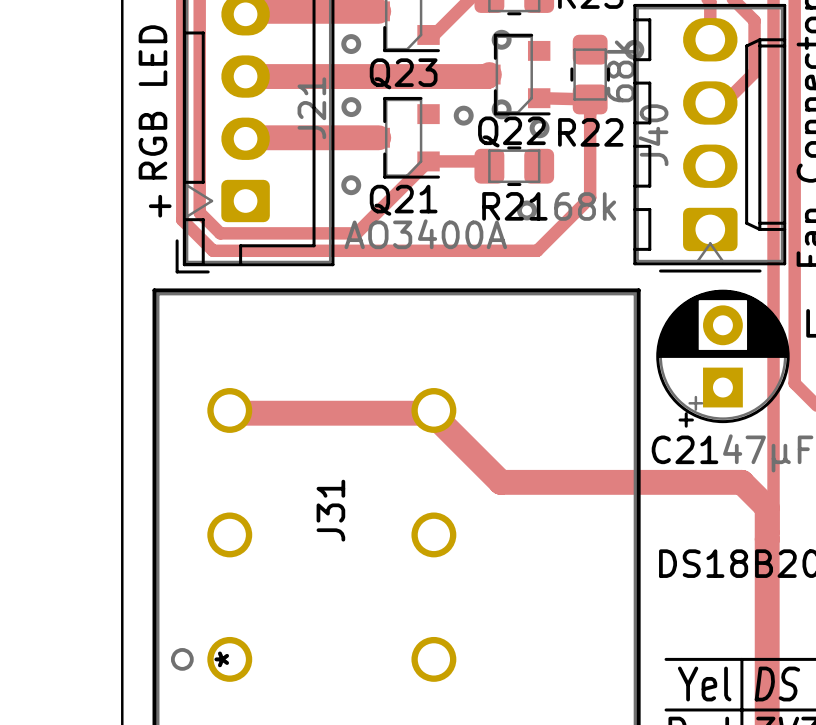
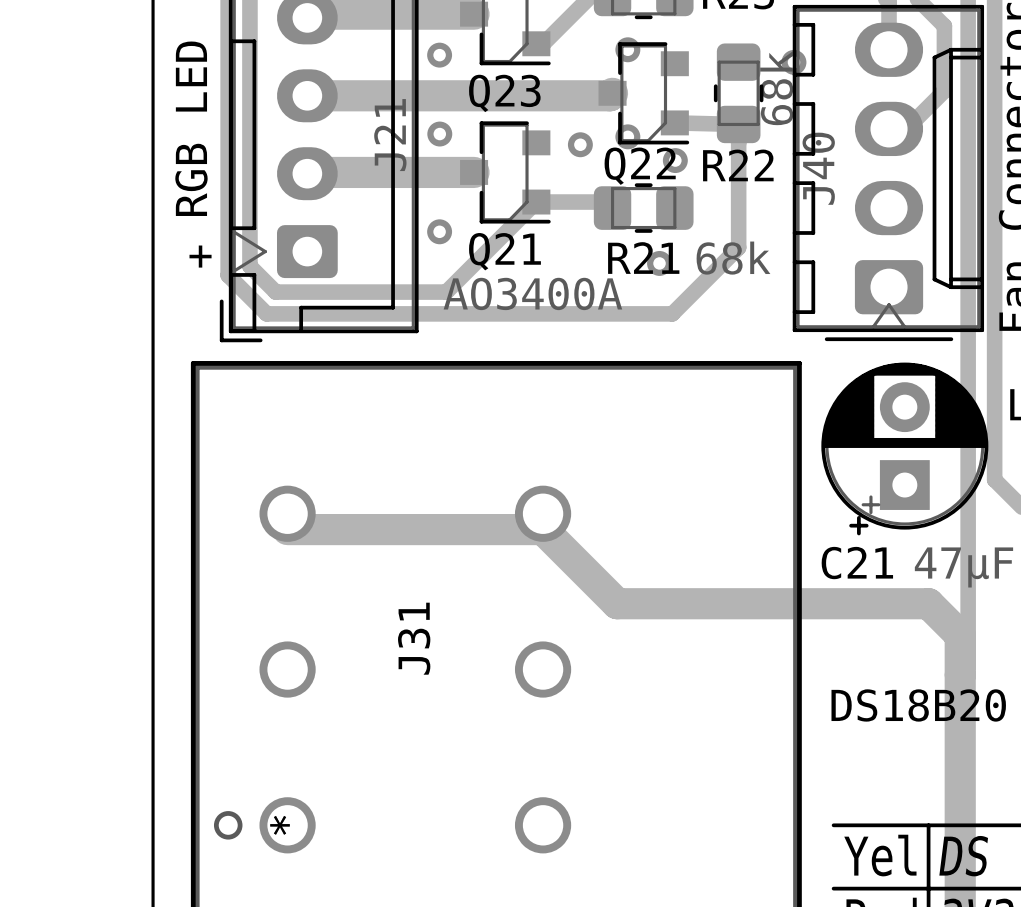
track: (229, 410) (232, 413) (431, 413) (500, 482) -> (287, 529) (543, 529) (617, 603) (626, 603)

